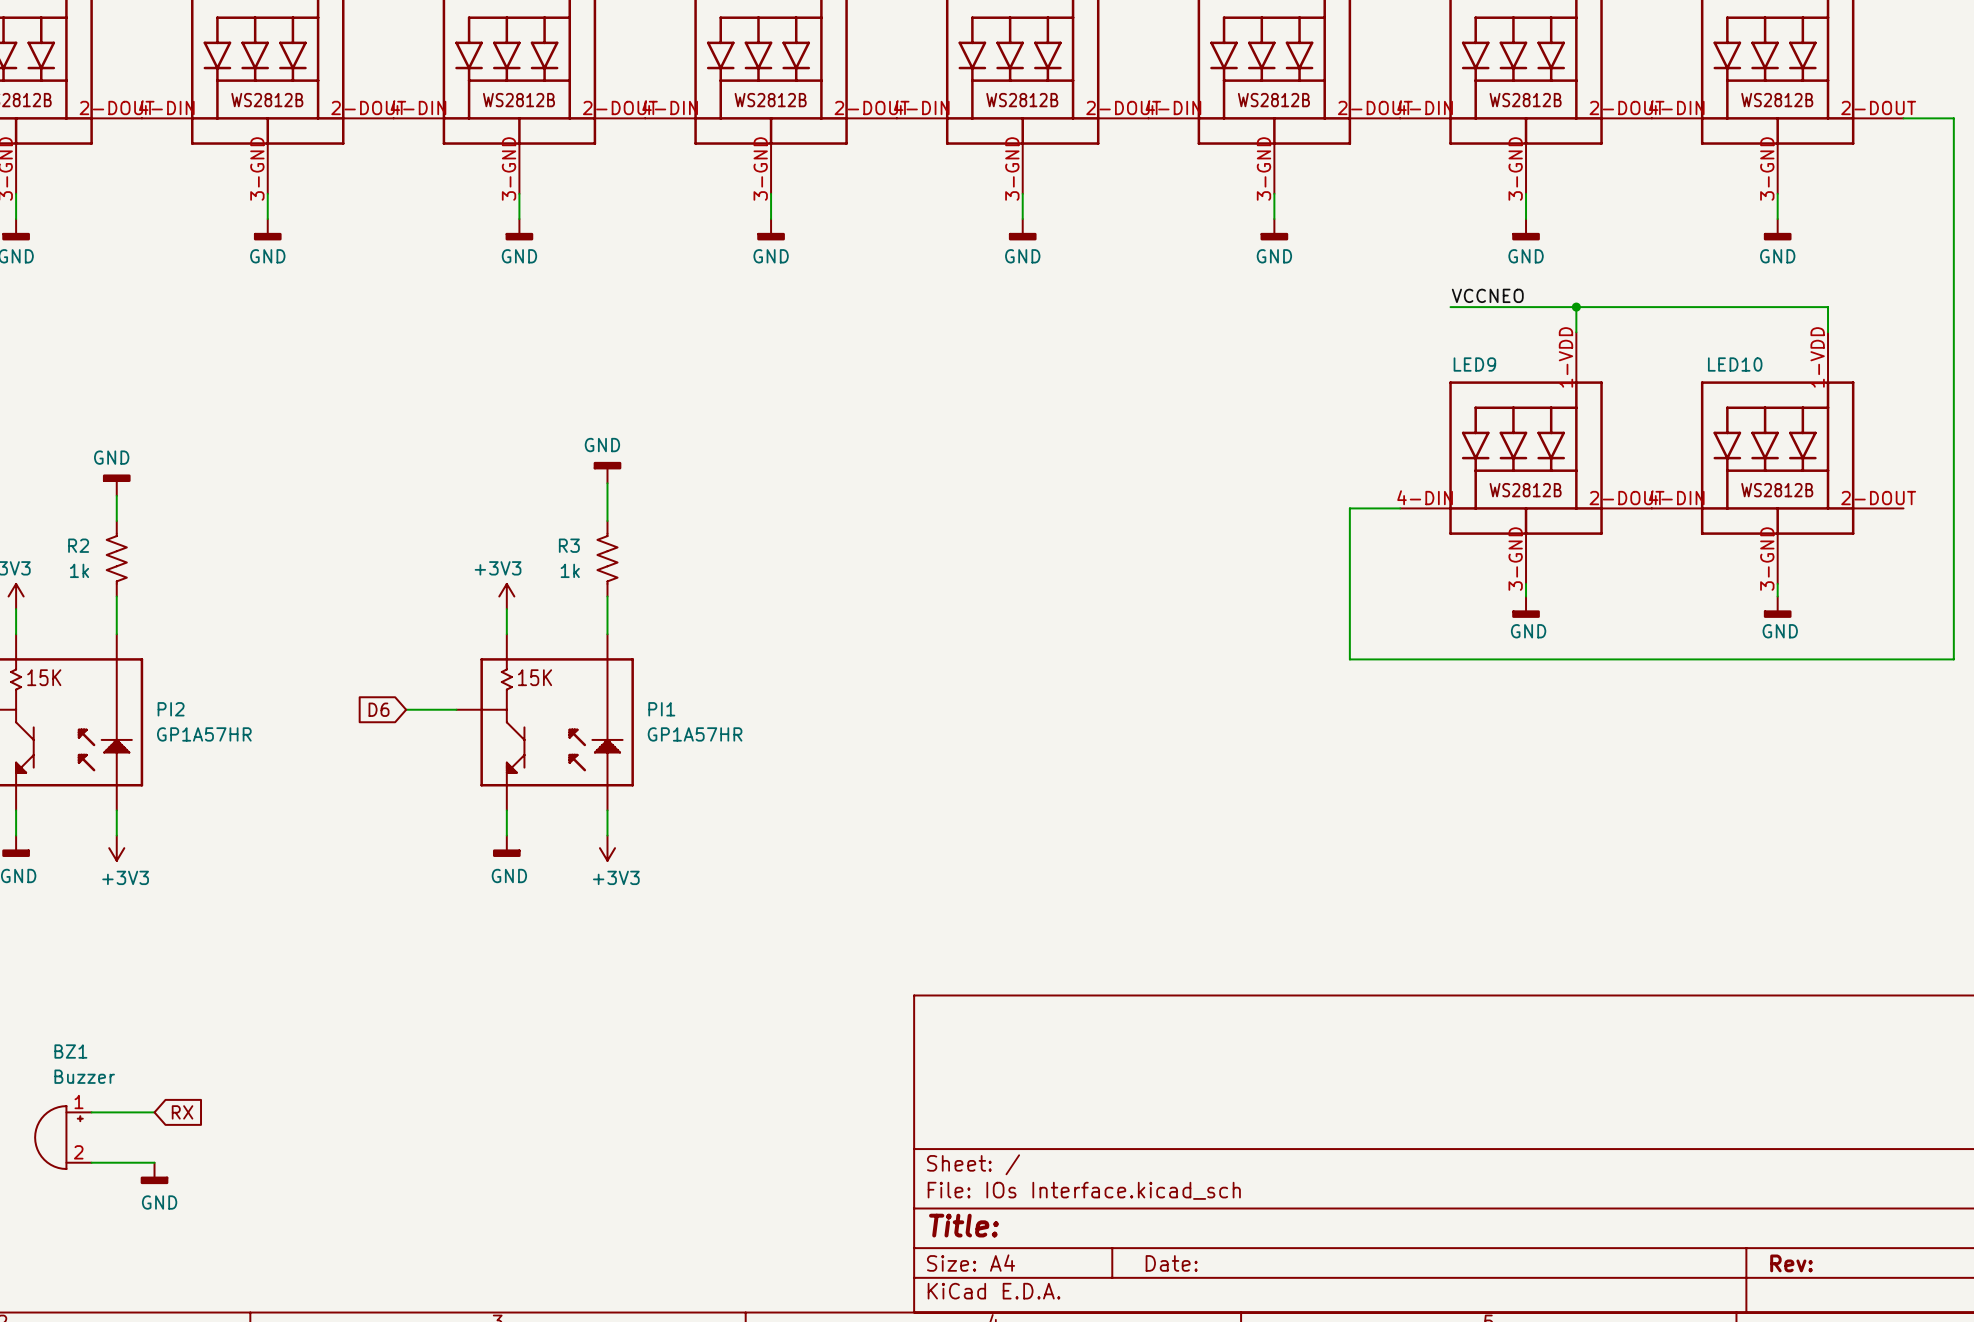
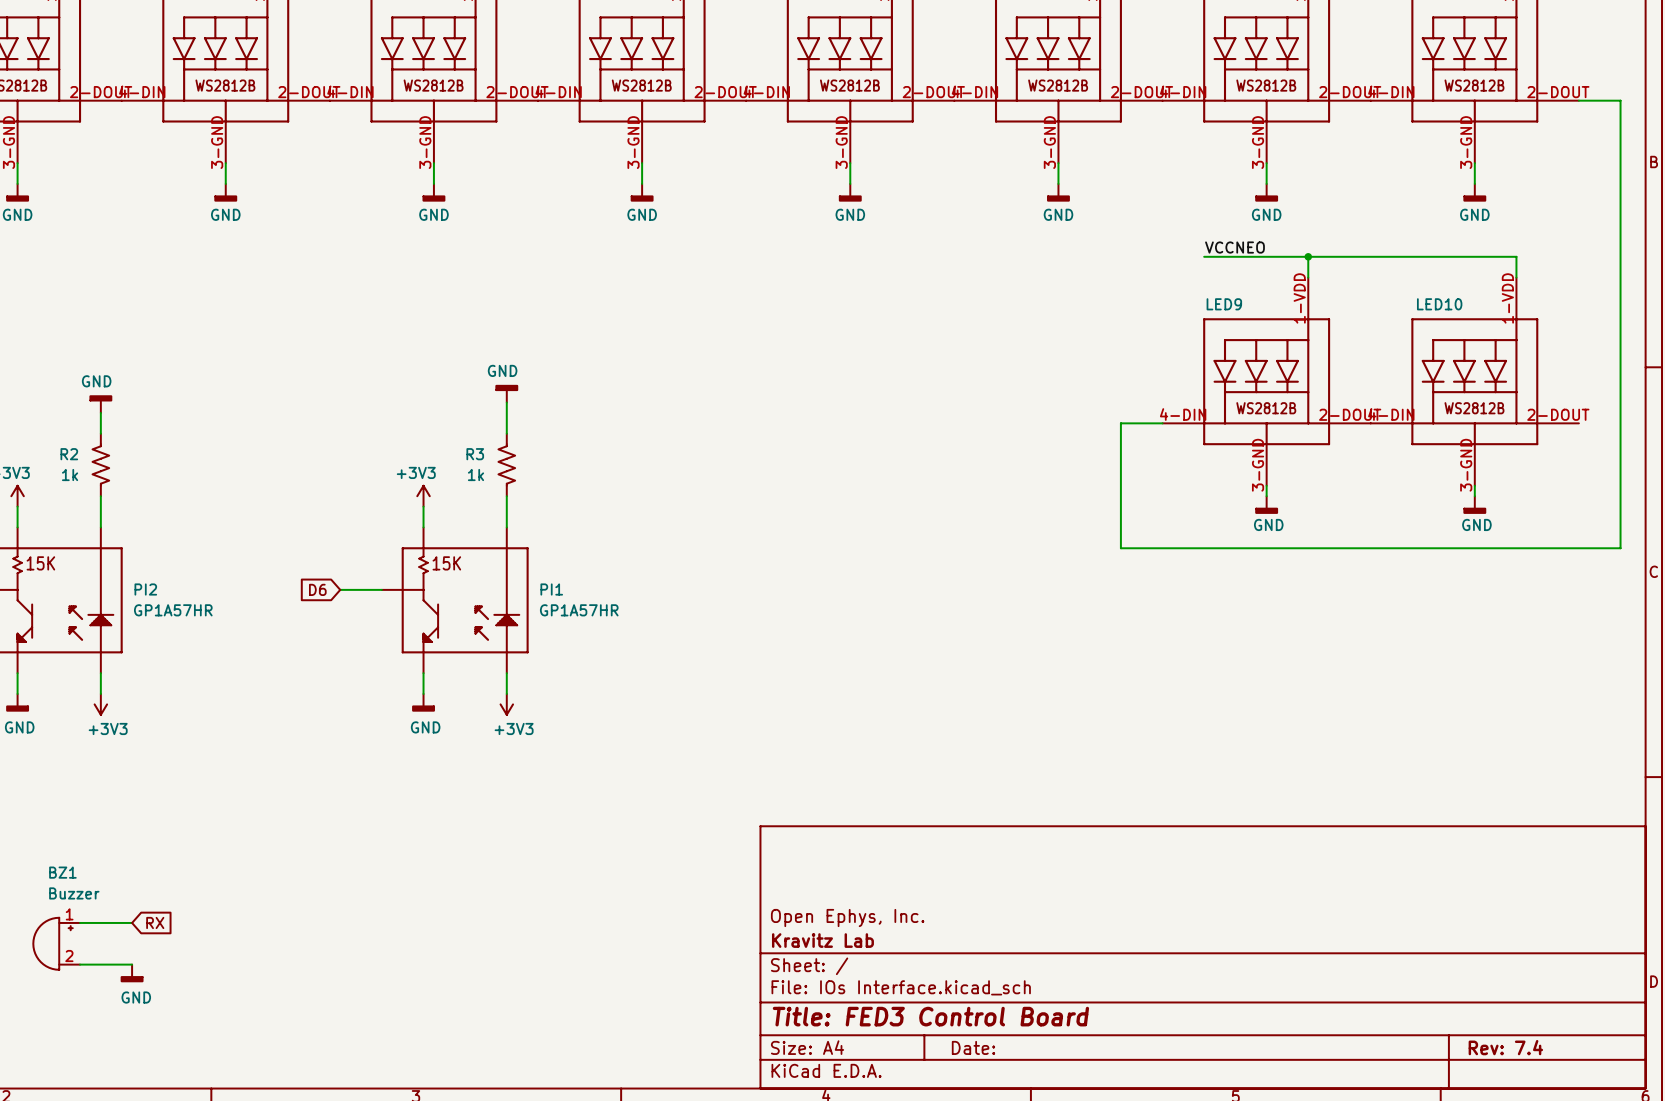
title block: none -> Open Ephys, Inc. (847, 918)
title block: none -> Kravitz Lab (822, 940)
title block: Title: (963, 1225) -> Title: FED3 Control Board (930, 1016)
title block: Rev: (1791, 1263) -> Rev: 7.4 (1505, 1047)

